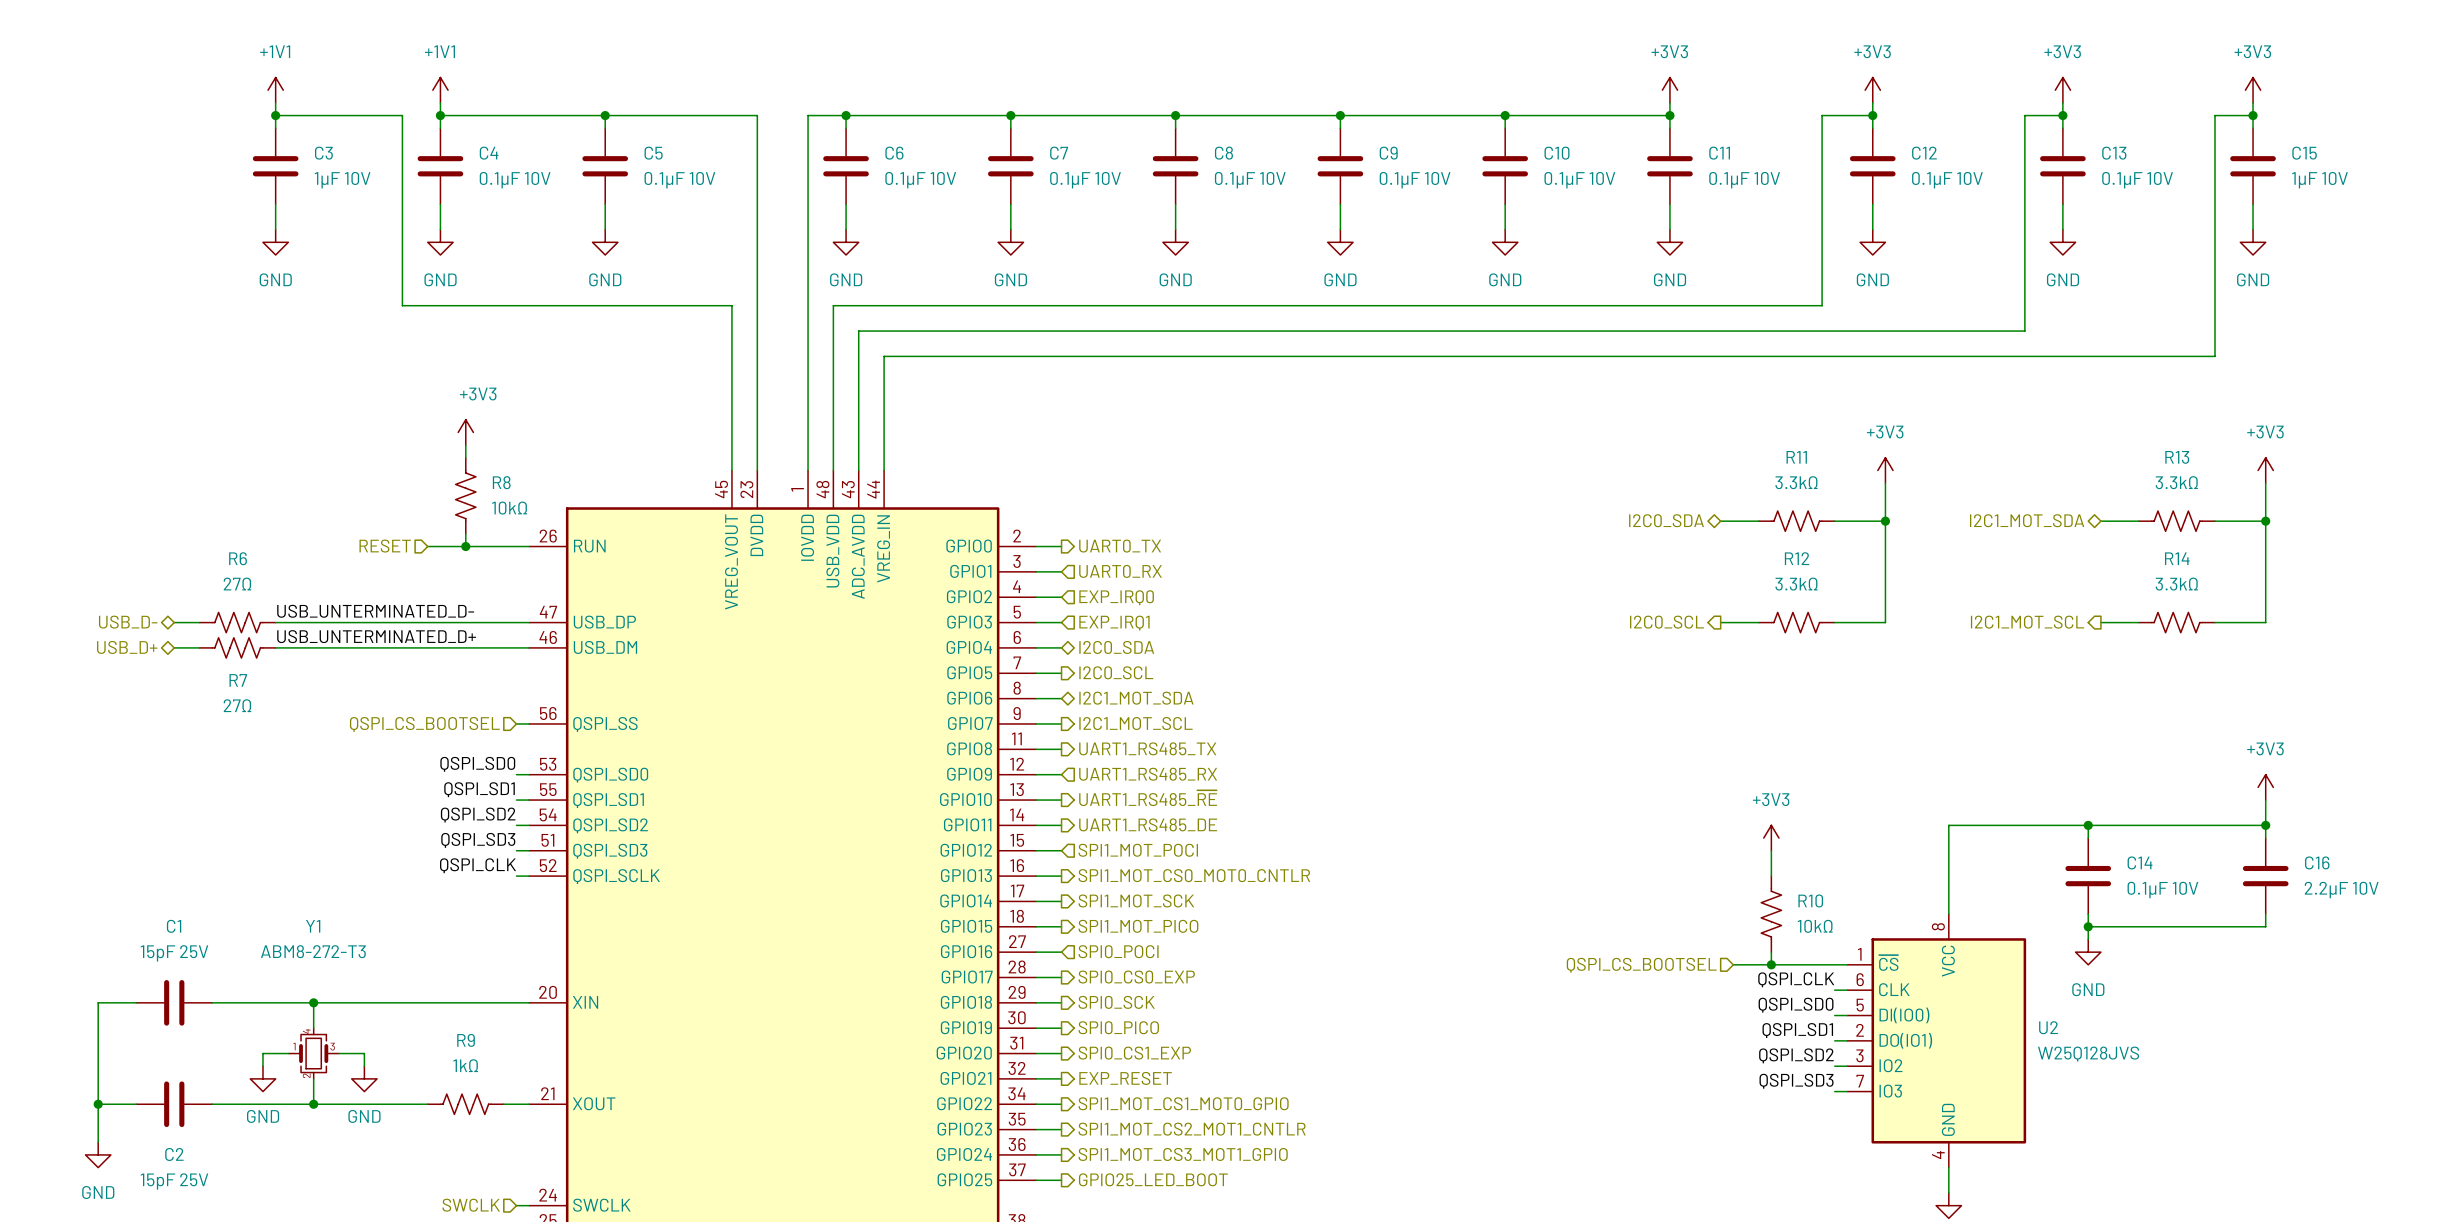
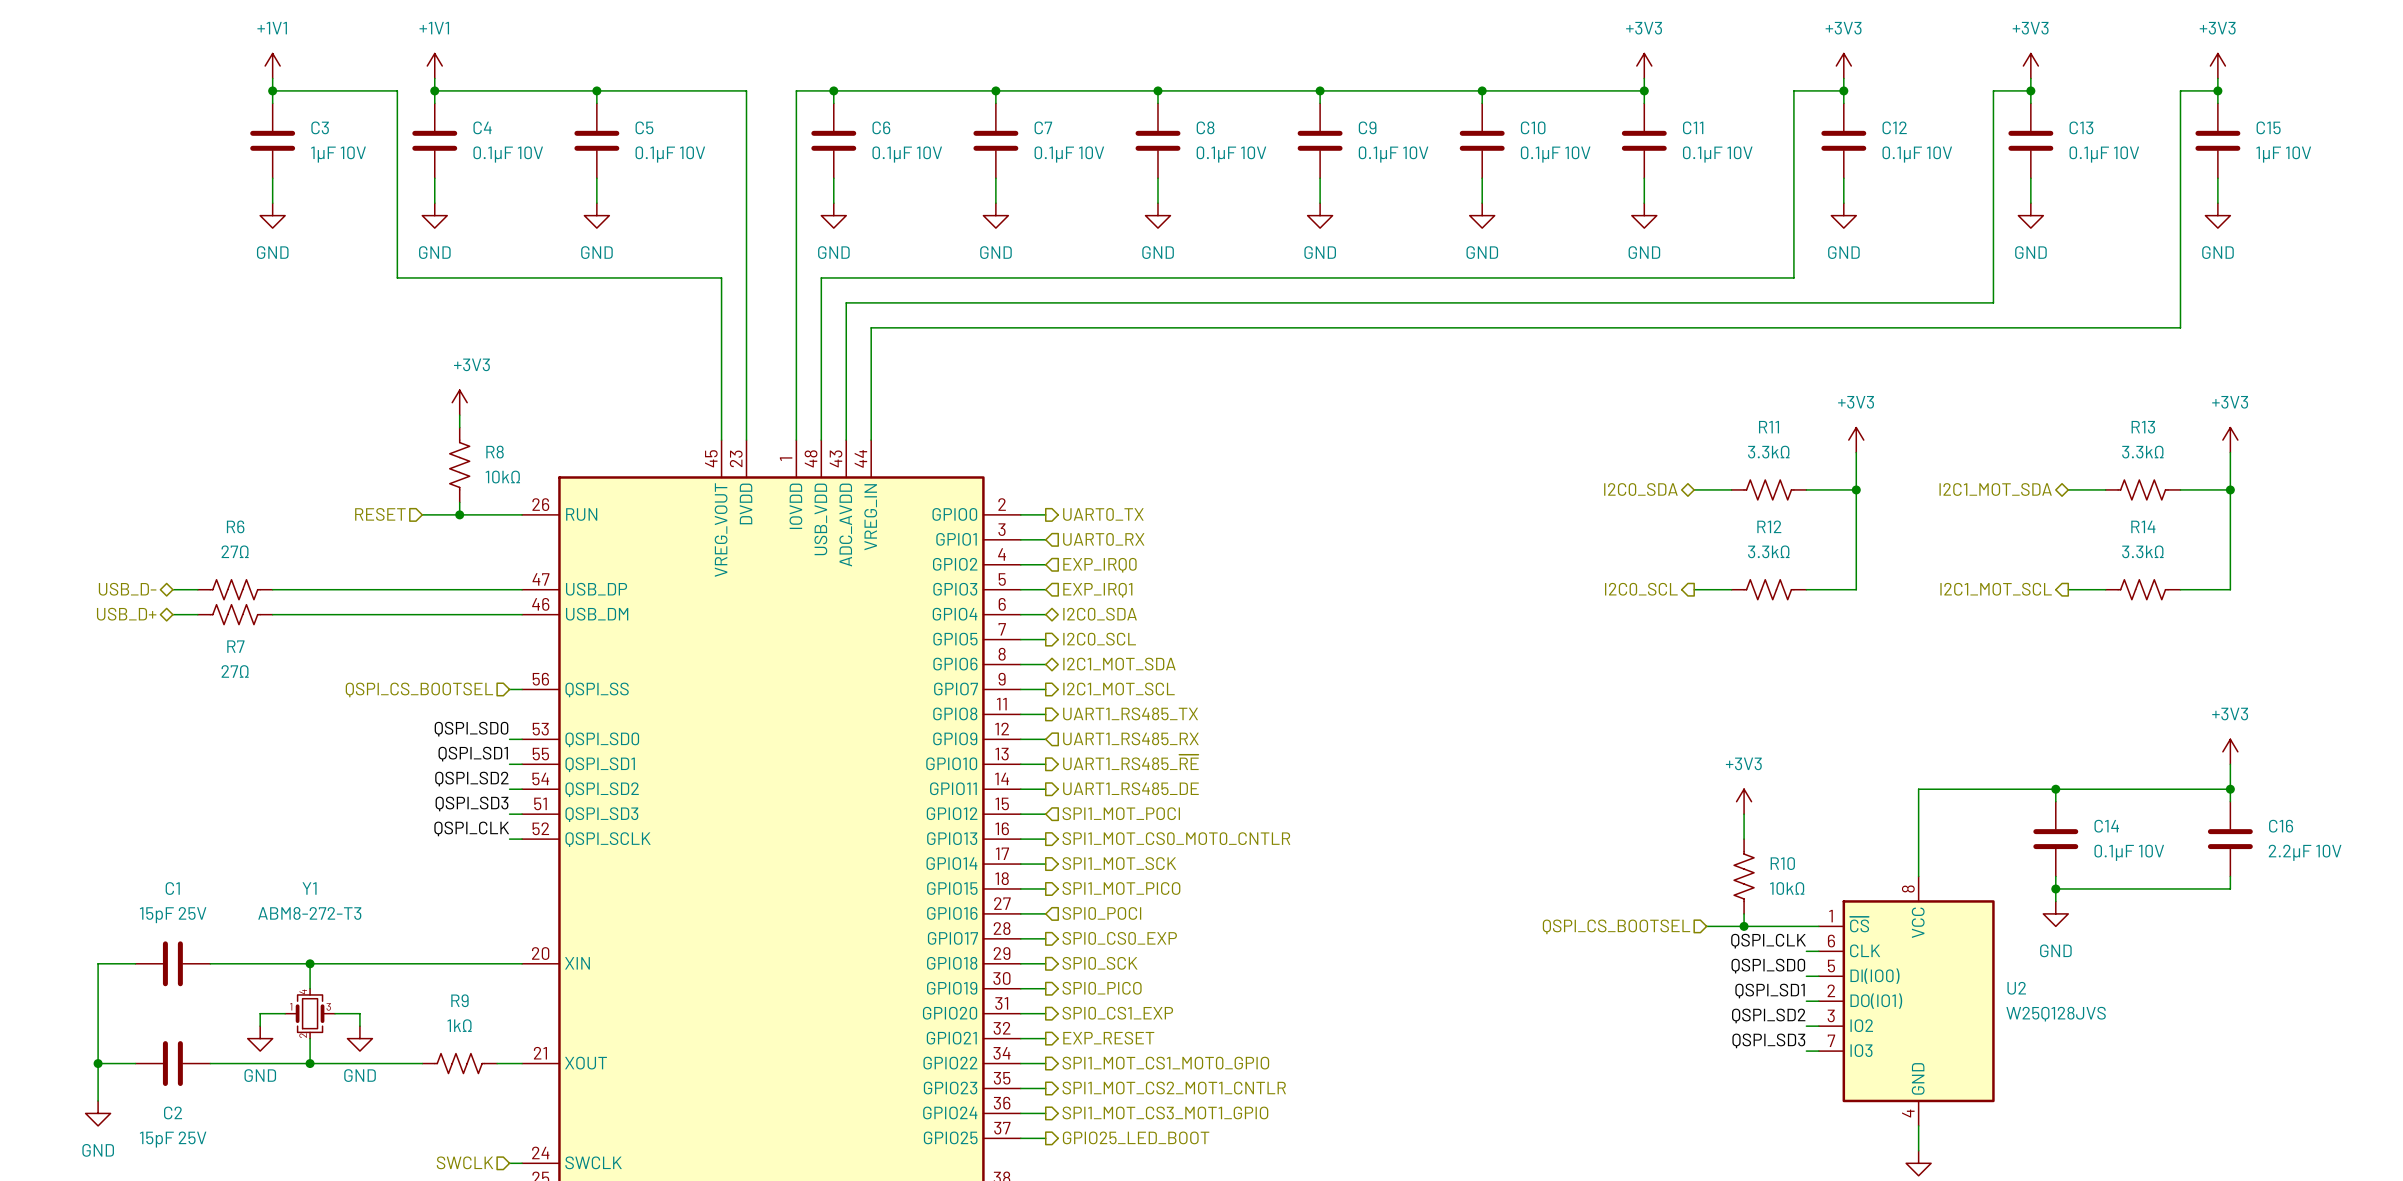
label: USB_UNTERMINATED_D- (375, 611) -> none
label: USB_UNTERMINATED_D+ (376, 636) -> none

